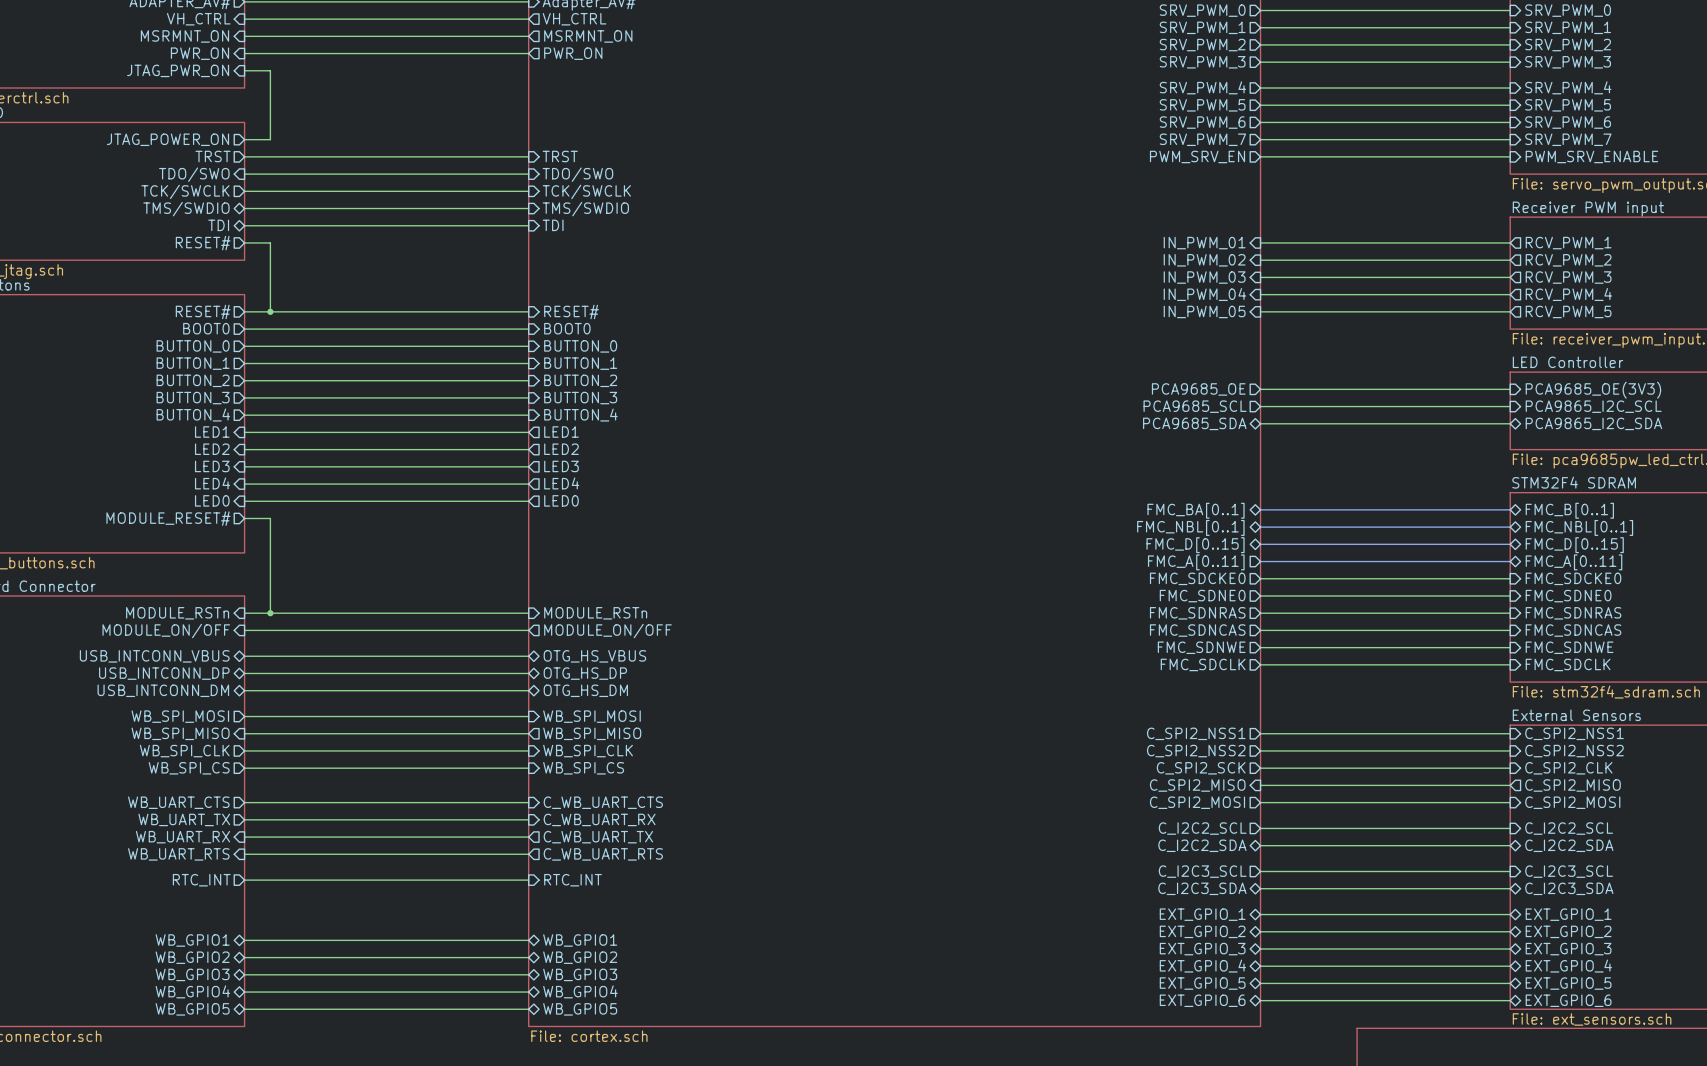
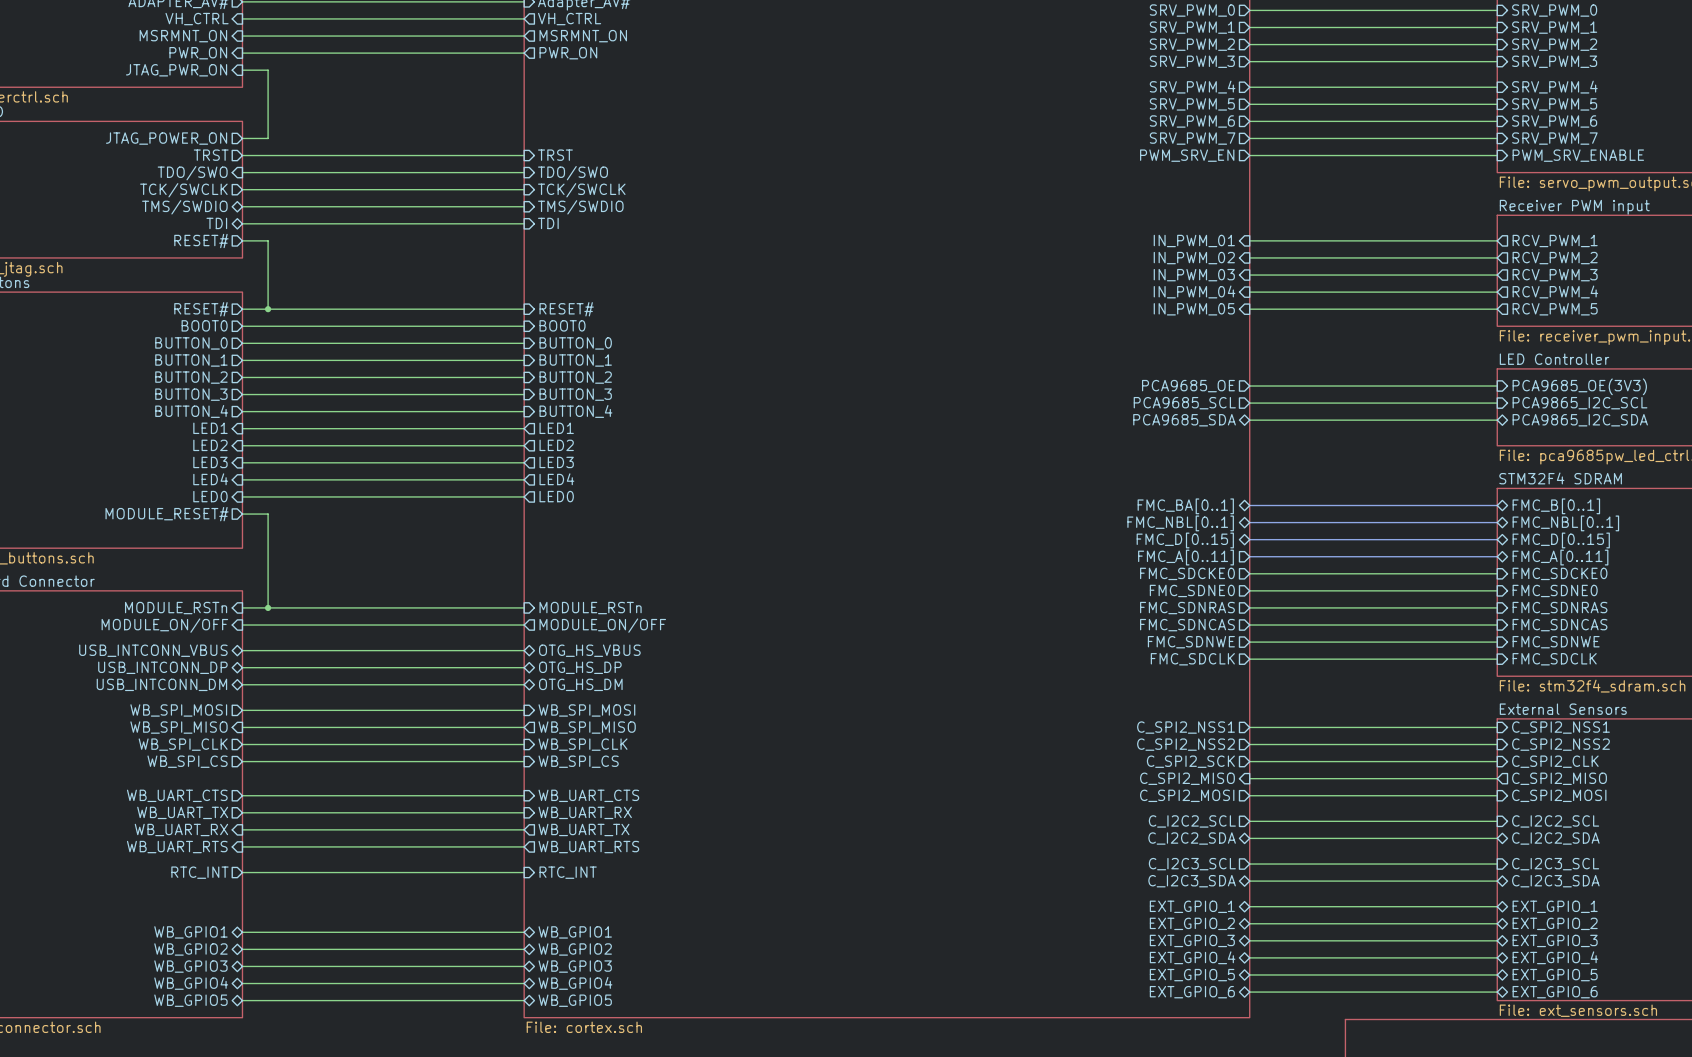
sheet pin: C_WB_UART_CTS (603, 802) -> WB_UART_CTS (588, 795)
sheet pin: C_WB_UART_RX (599, 819) -> WB_UART_RX (585, 812)
sheet pin: C_WB_UART_TX (598, 837) -> WB_UART_TX (583, 829)
sheet pin: C_WB_UART_RTS (603, 854) -> WB_UART_RTS (588, 847)

